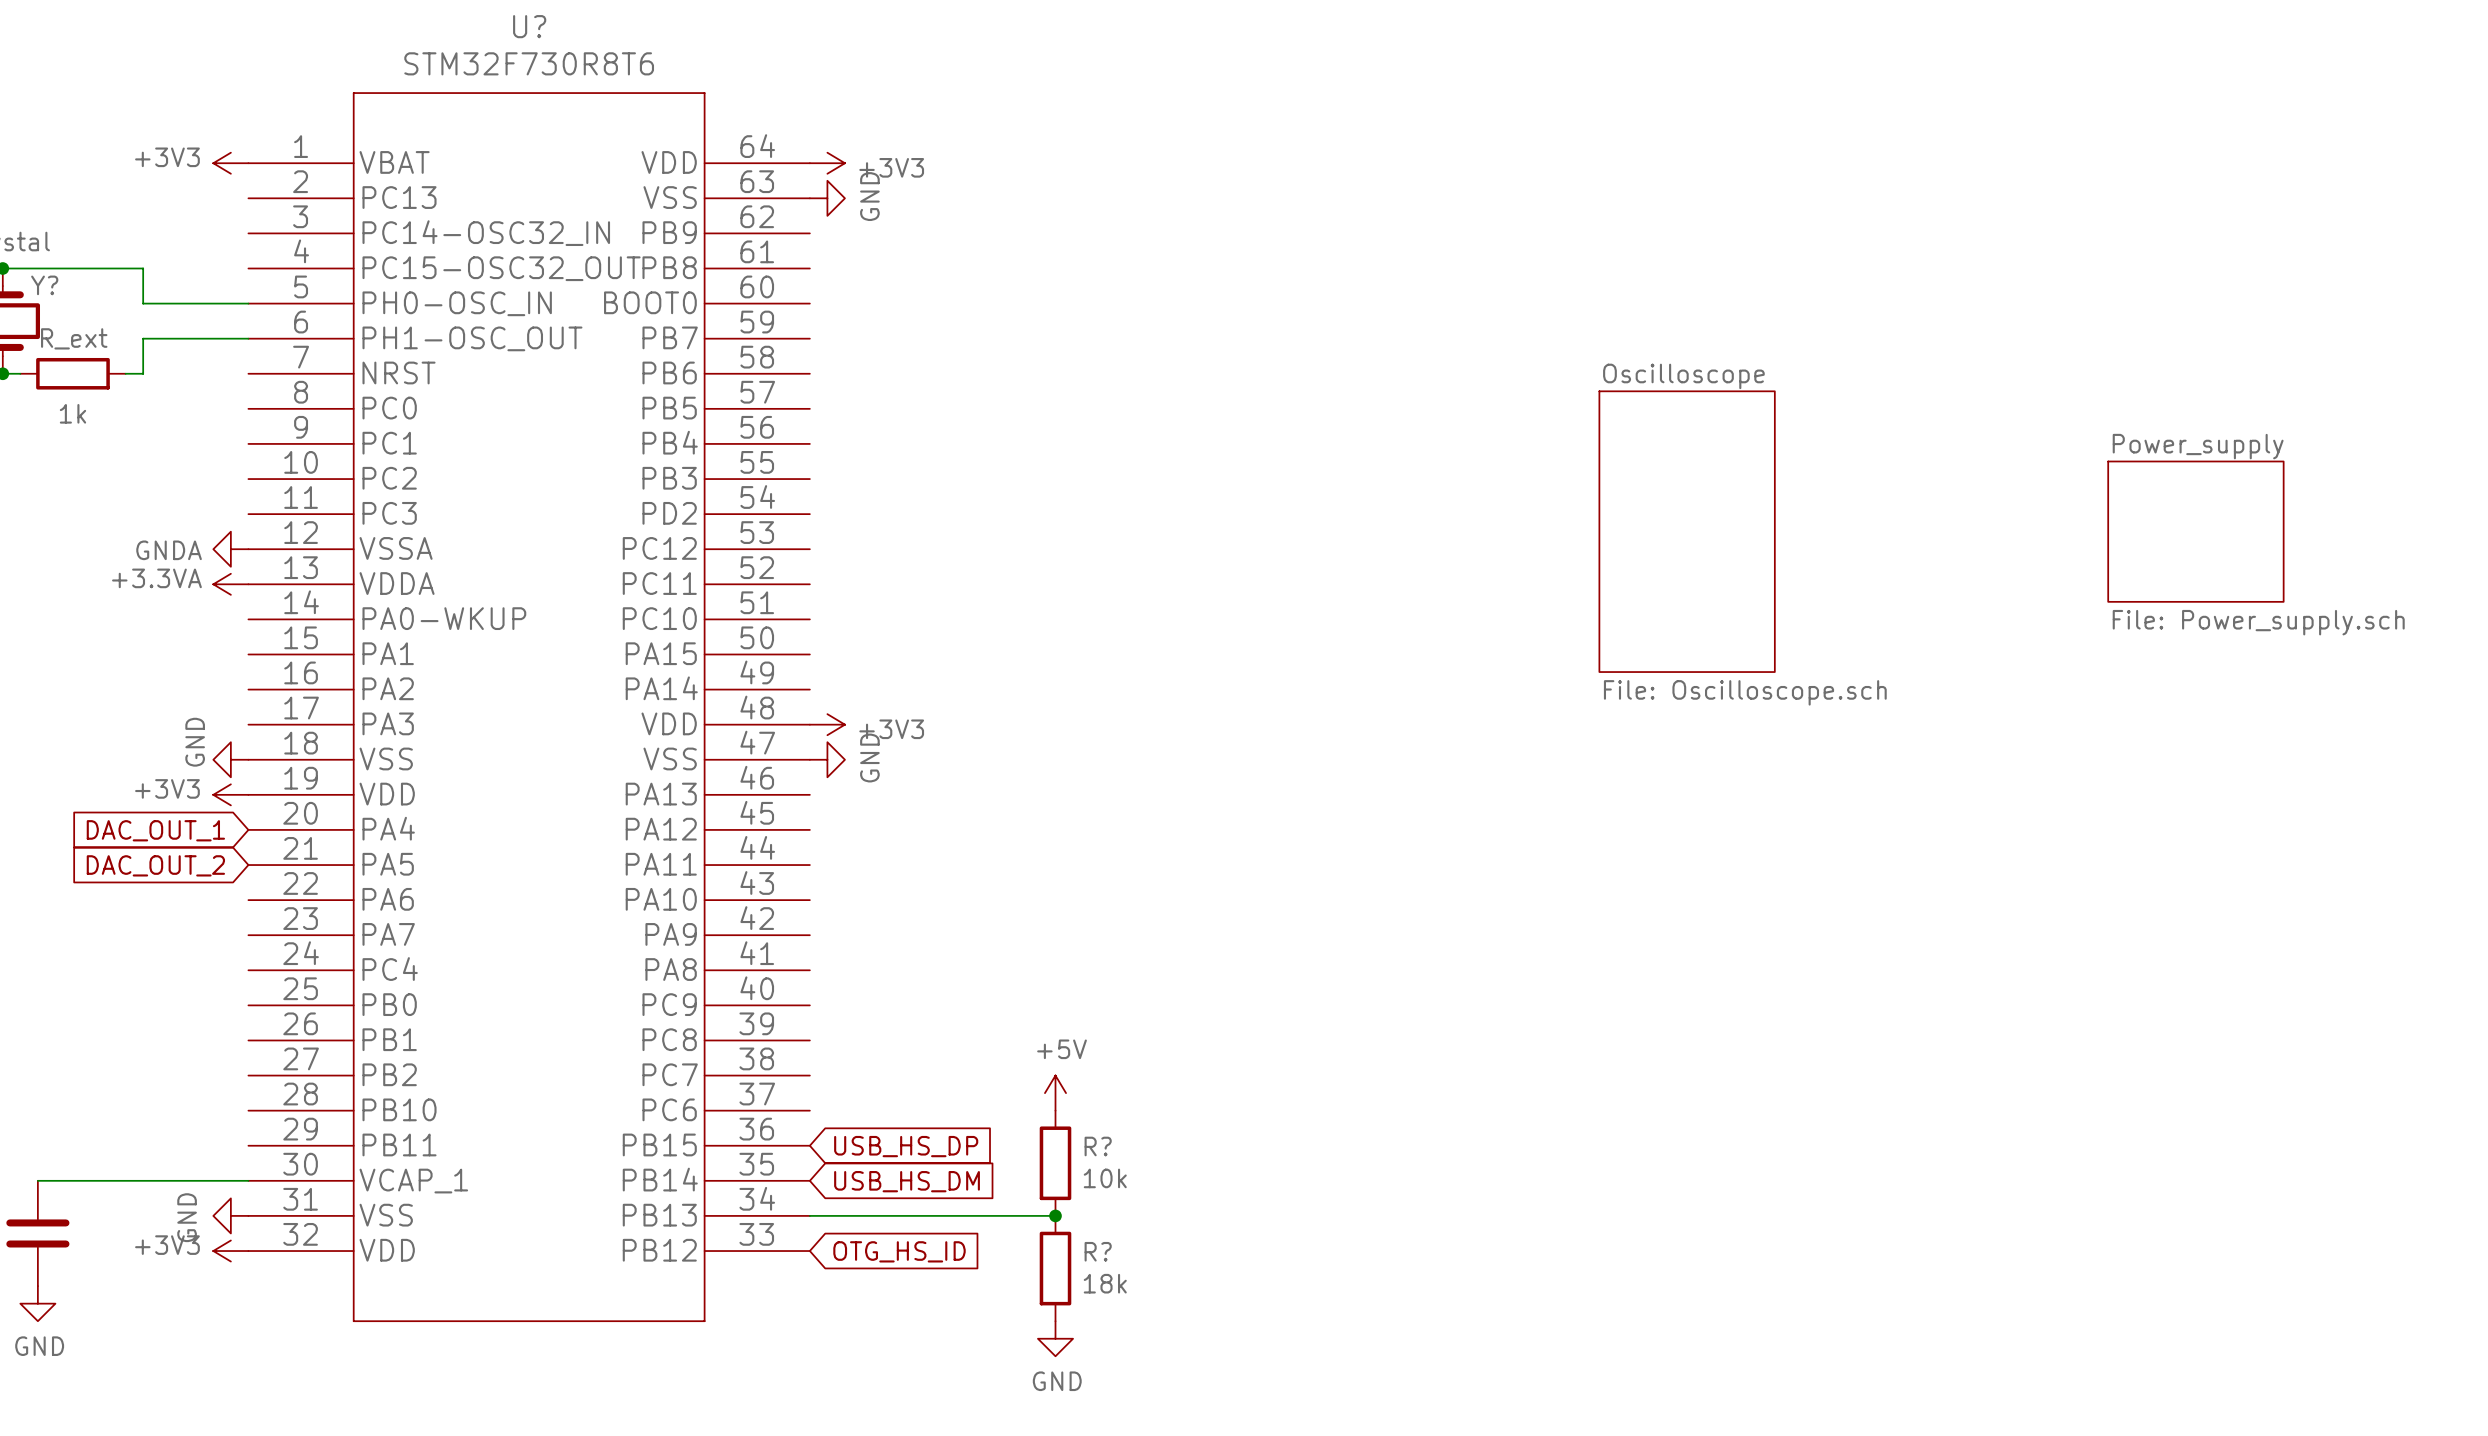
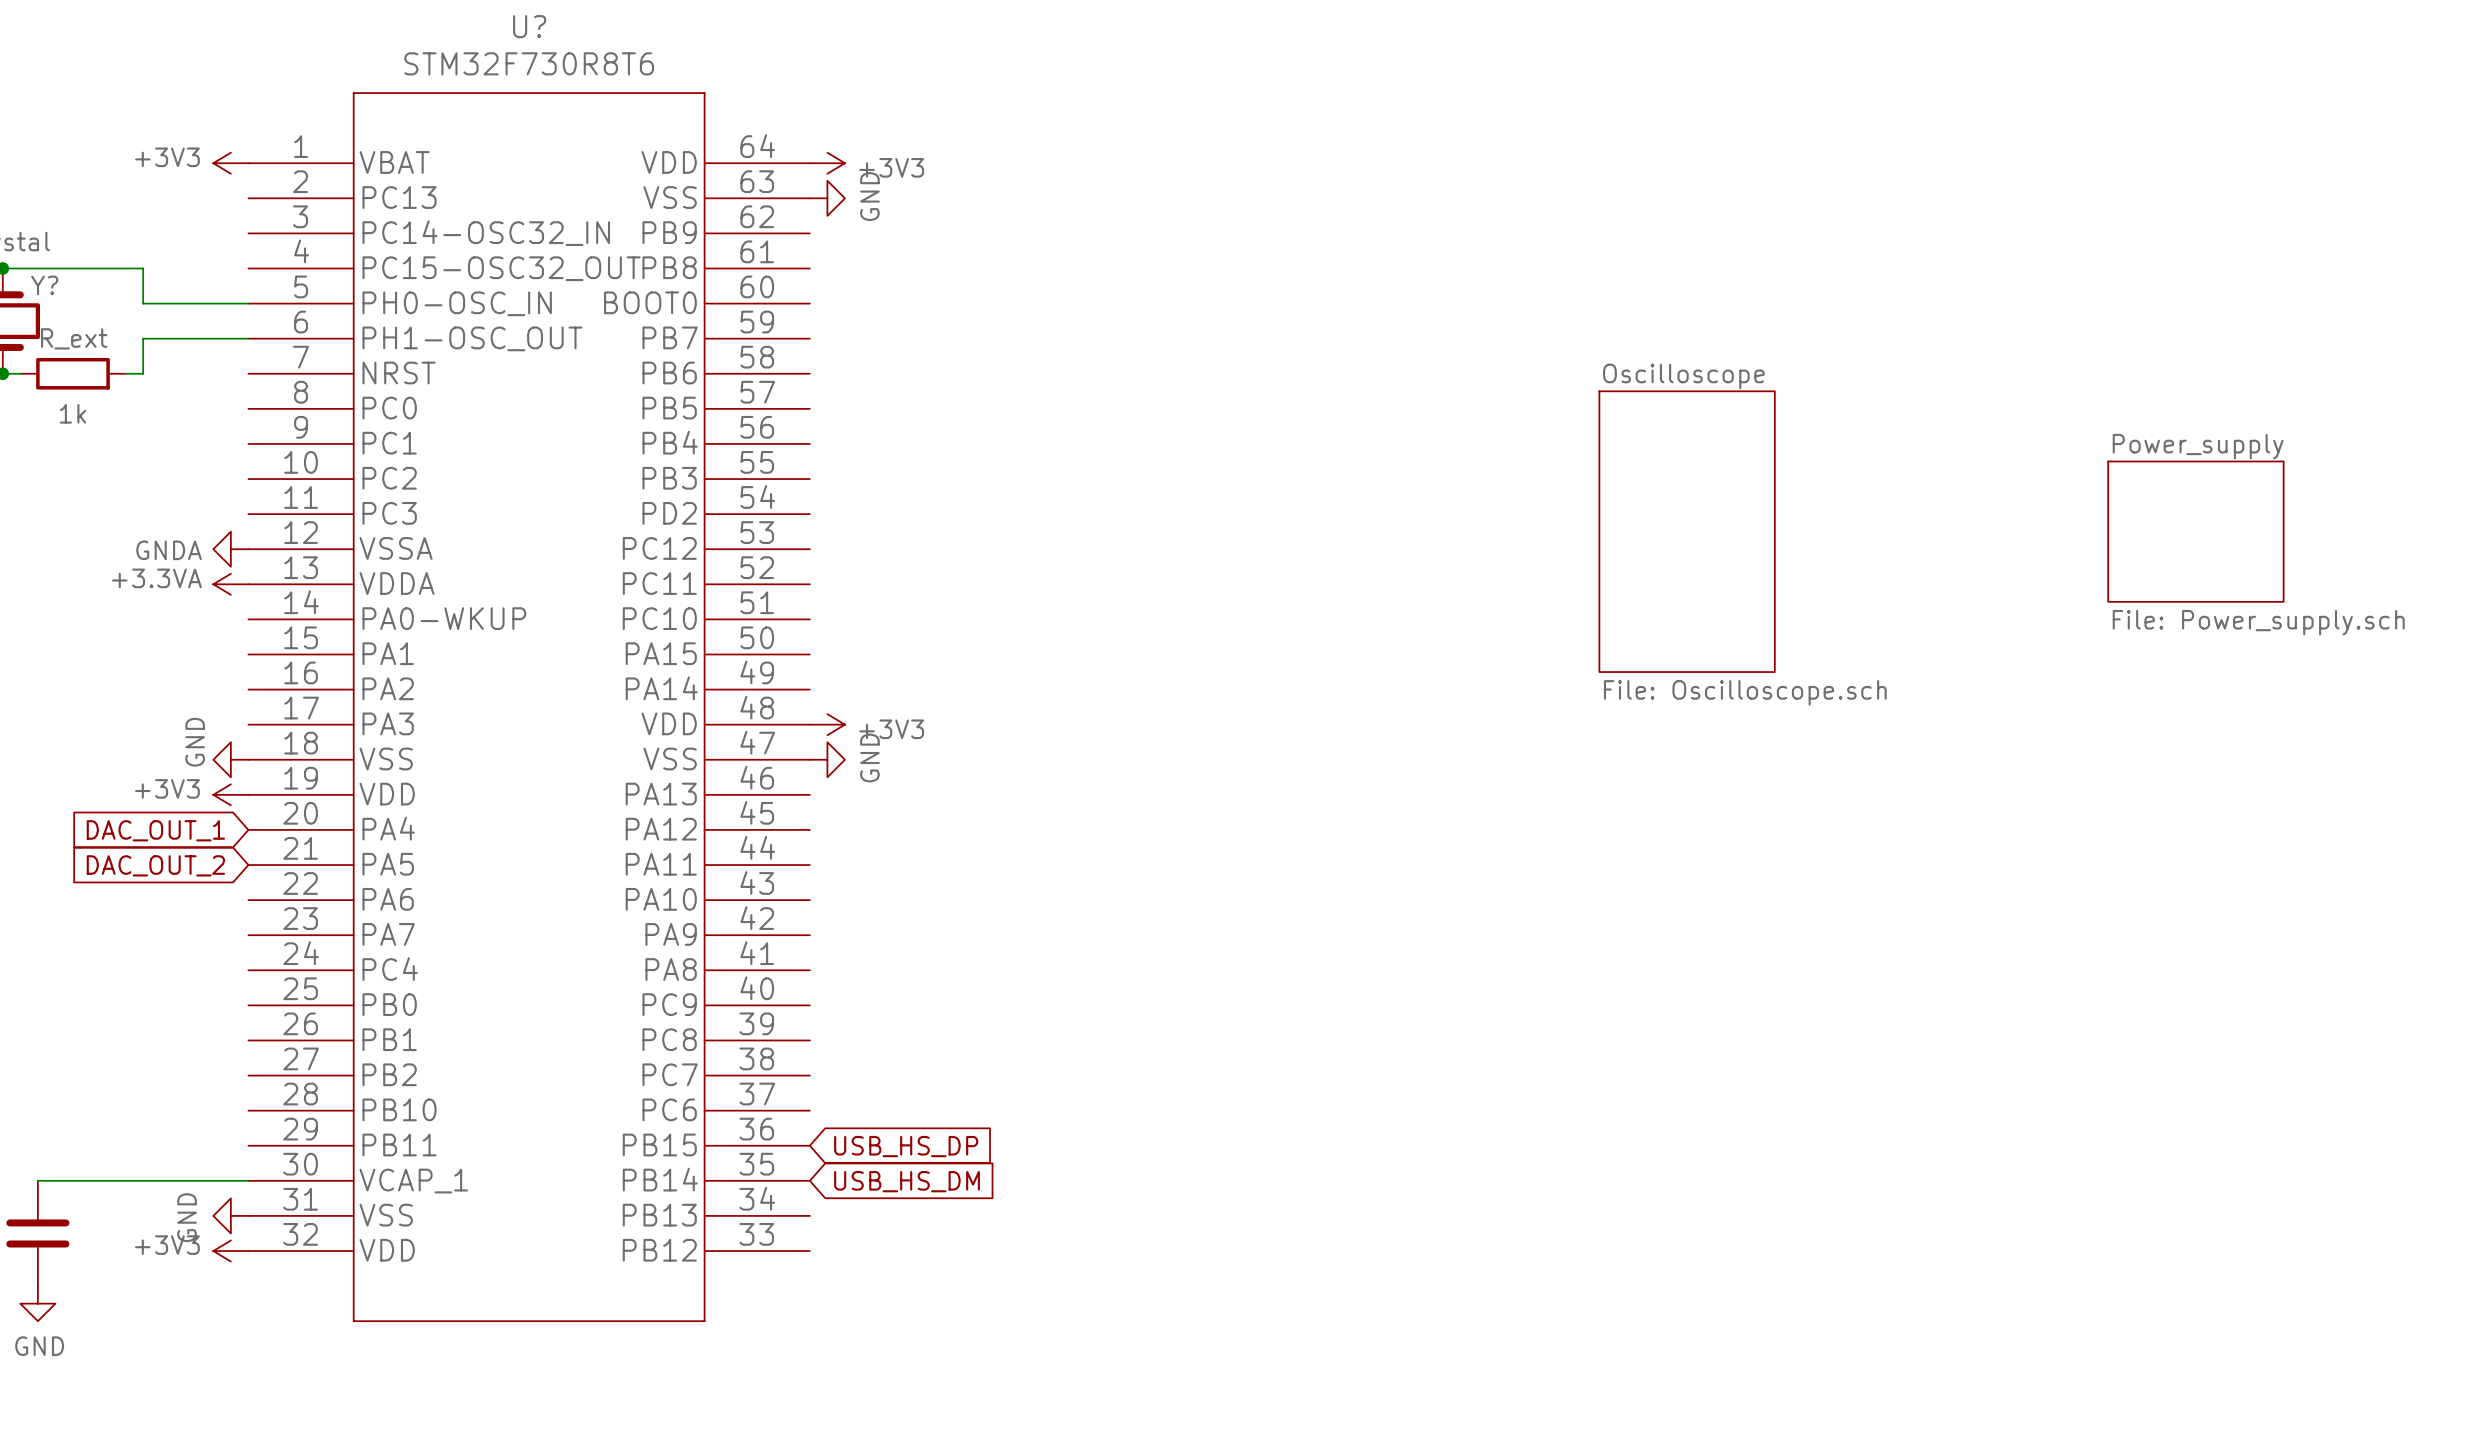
power symbol: +5V (1055, 1093) -> none
R?: 10k (1055, 1163) -> none
wire: (809, 1215) (1055, 1215) -> none
junction: (1055, 1215) -> none
global label: OTG_HS_ID (899, 1251) -> none
R?: 18k (1055, 1268) -> none
power symbol: GND (1055, 1338) -> none

